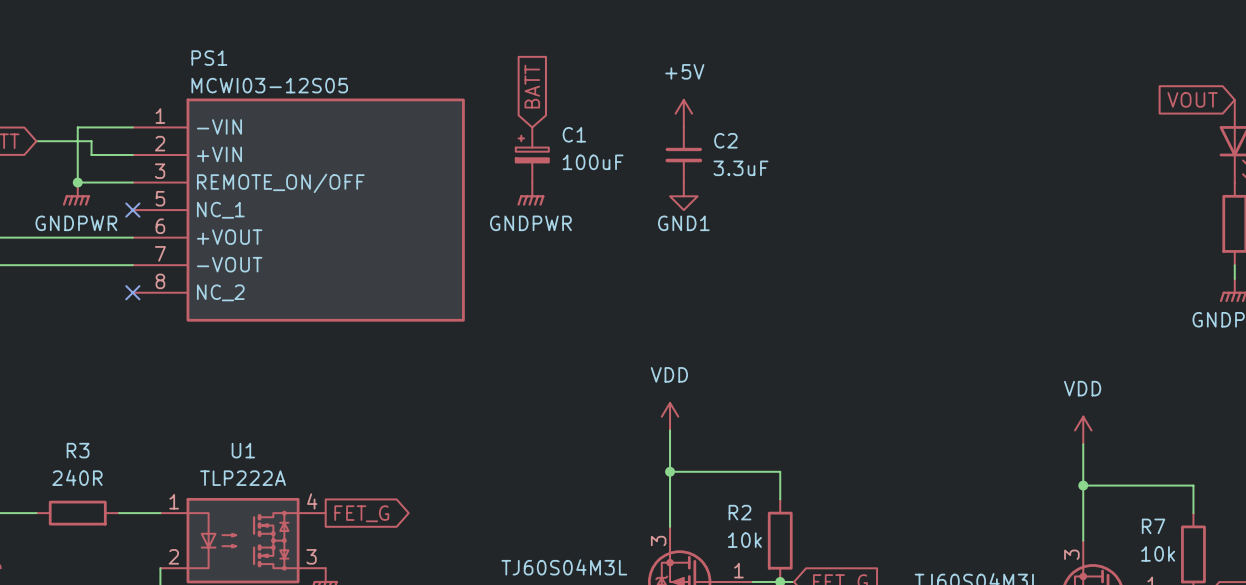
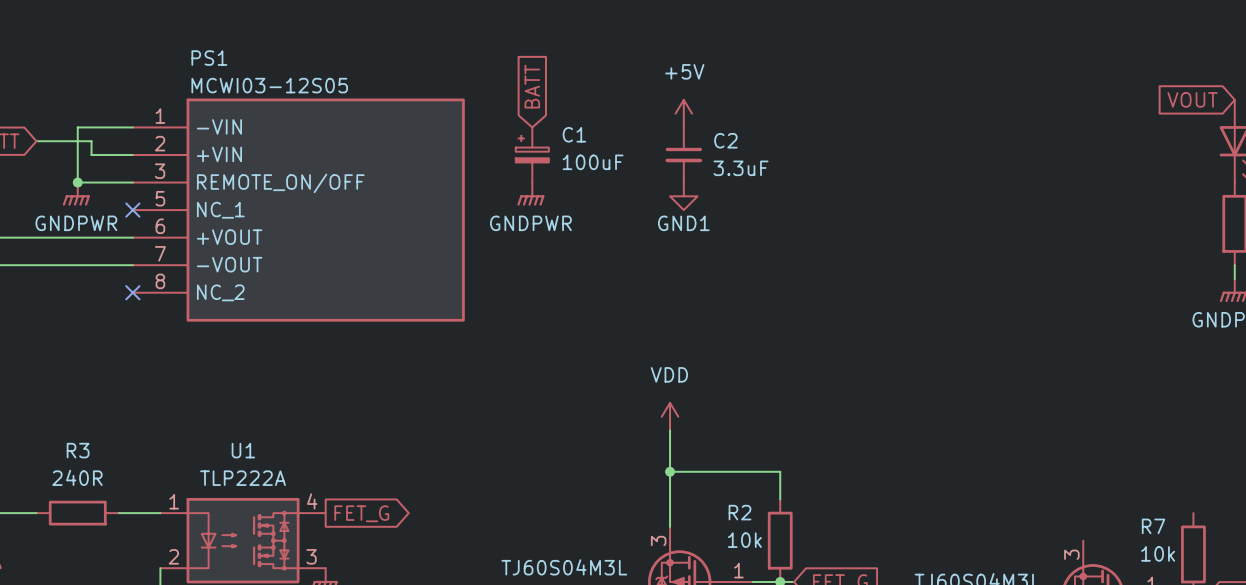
power symbol: VDD (1083, 430) -> none
wire: (1083, 444) (1083, 540) -> none
wire: (1083, 485) (1193, 485) (1193, 513) -> none
junction: (1083, 485) -> none

